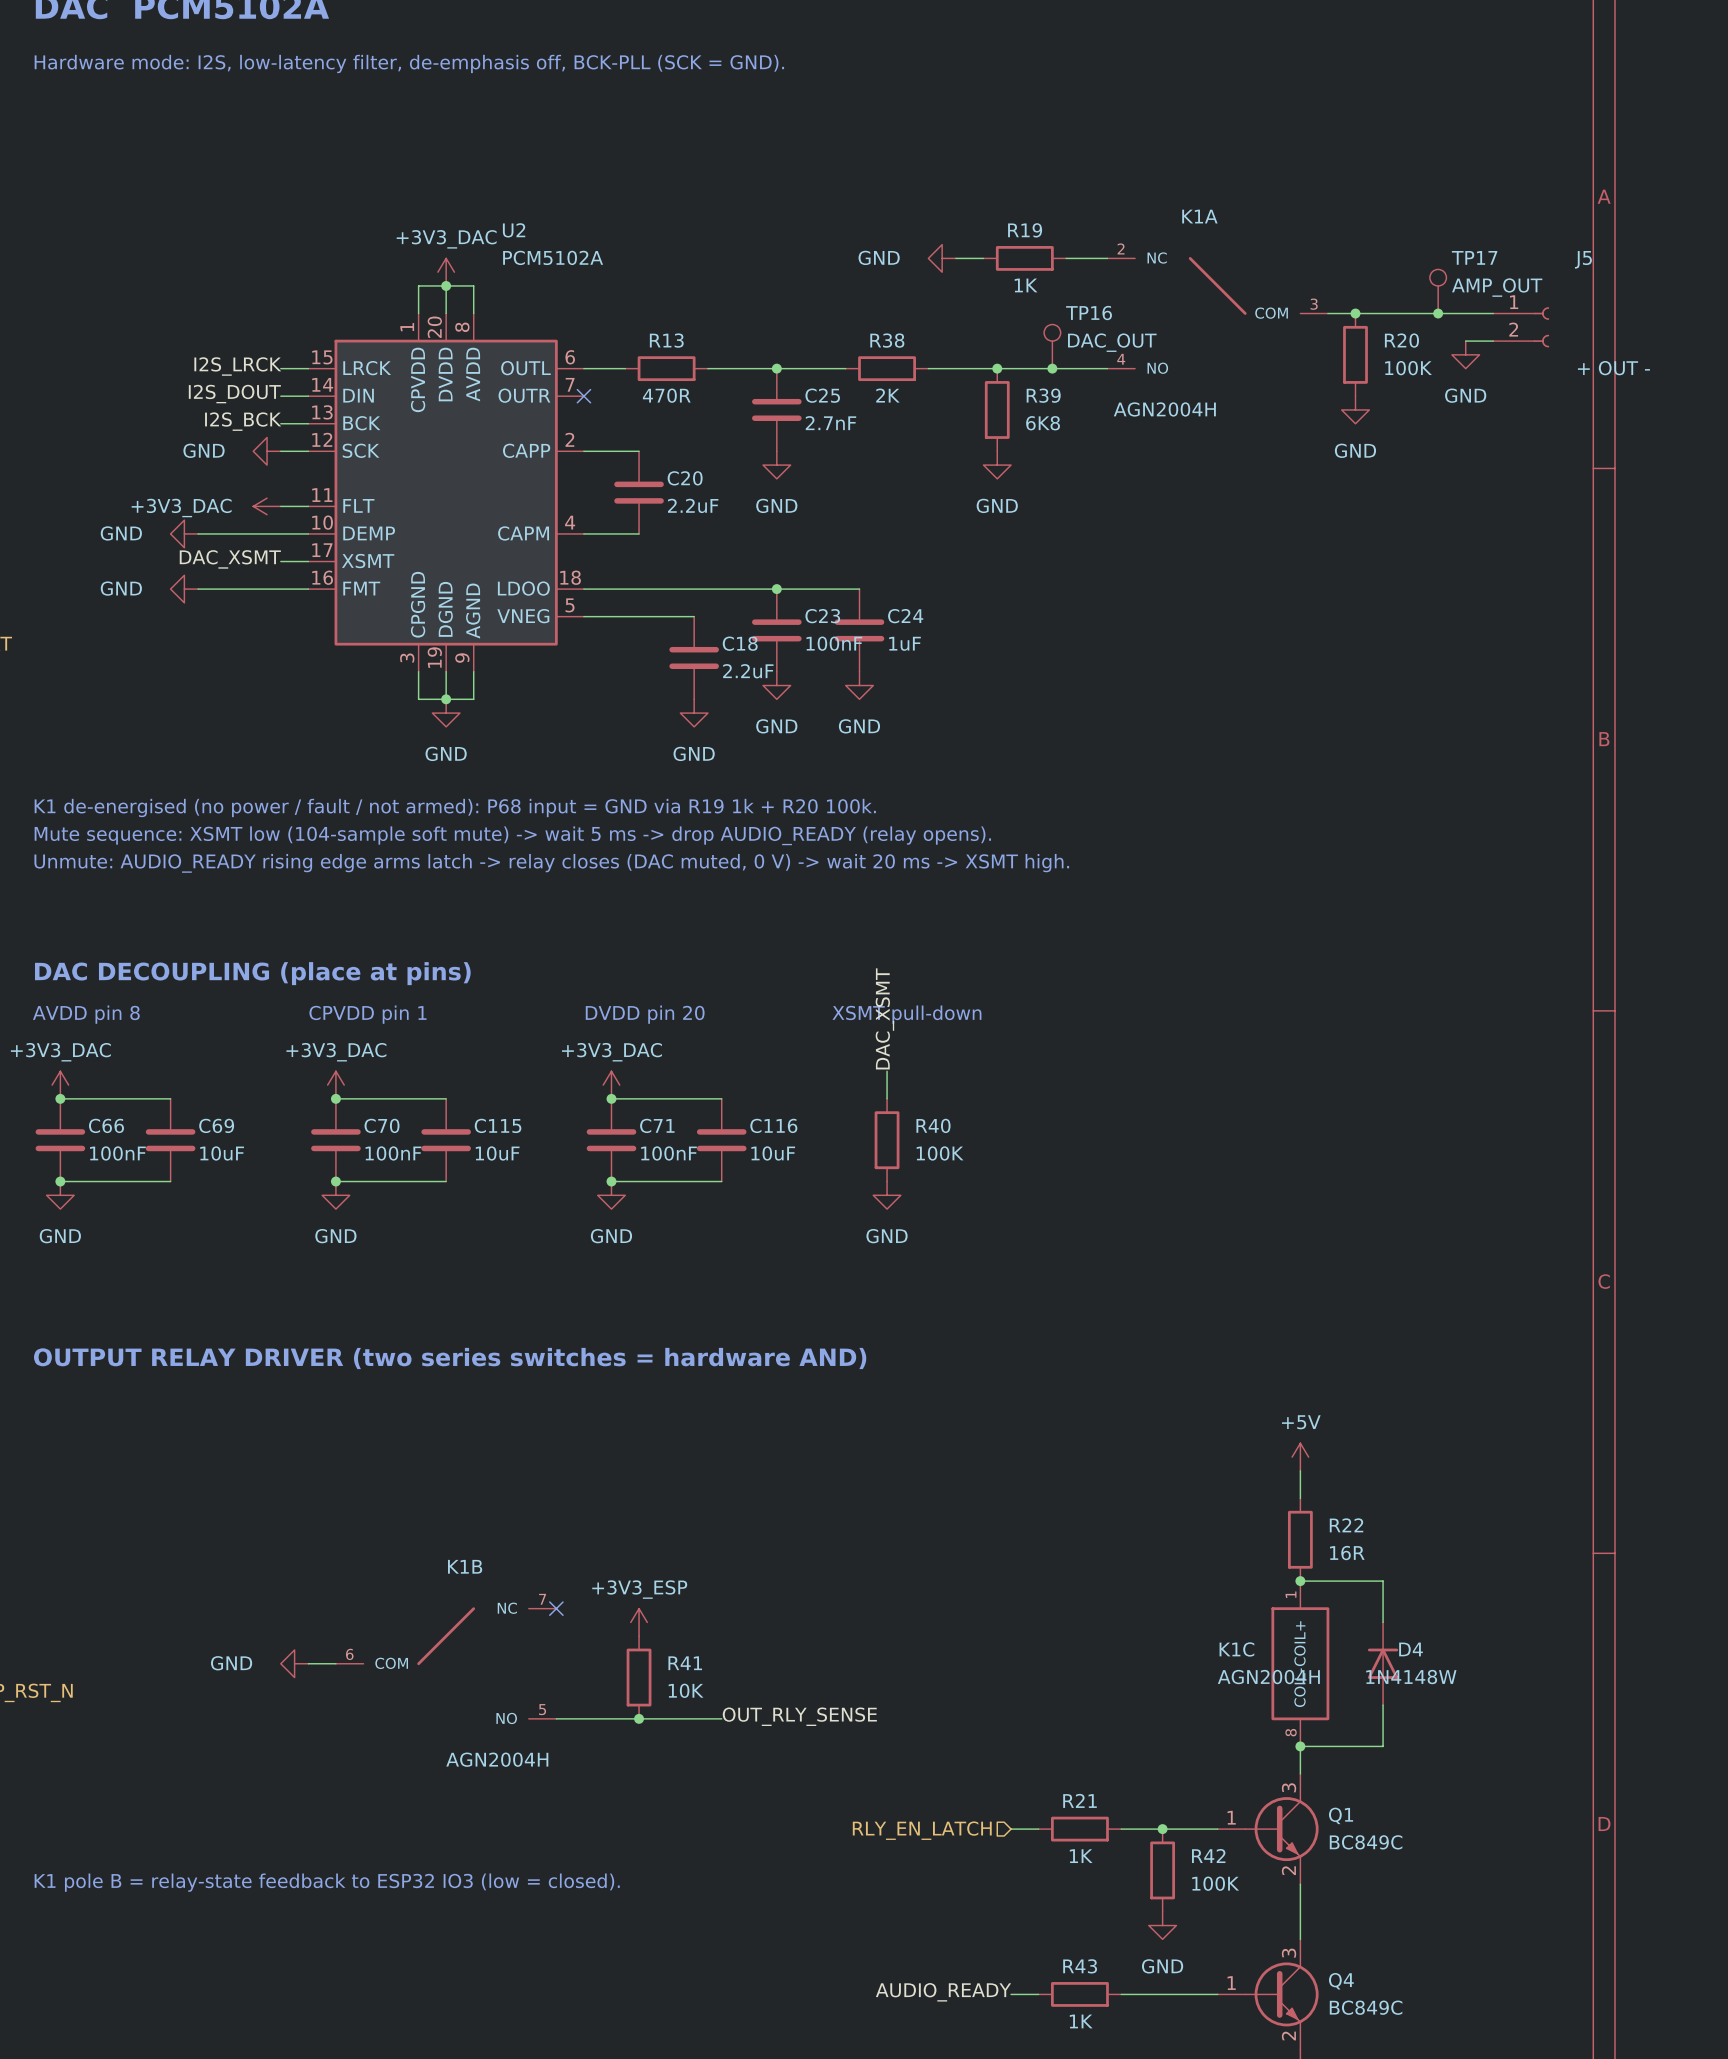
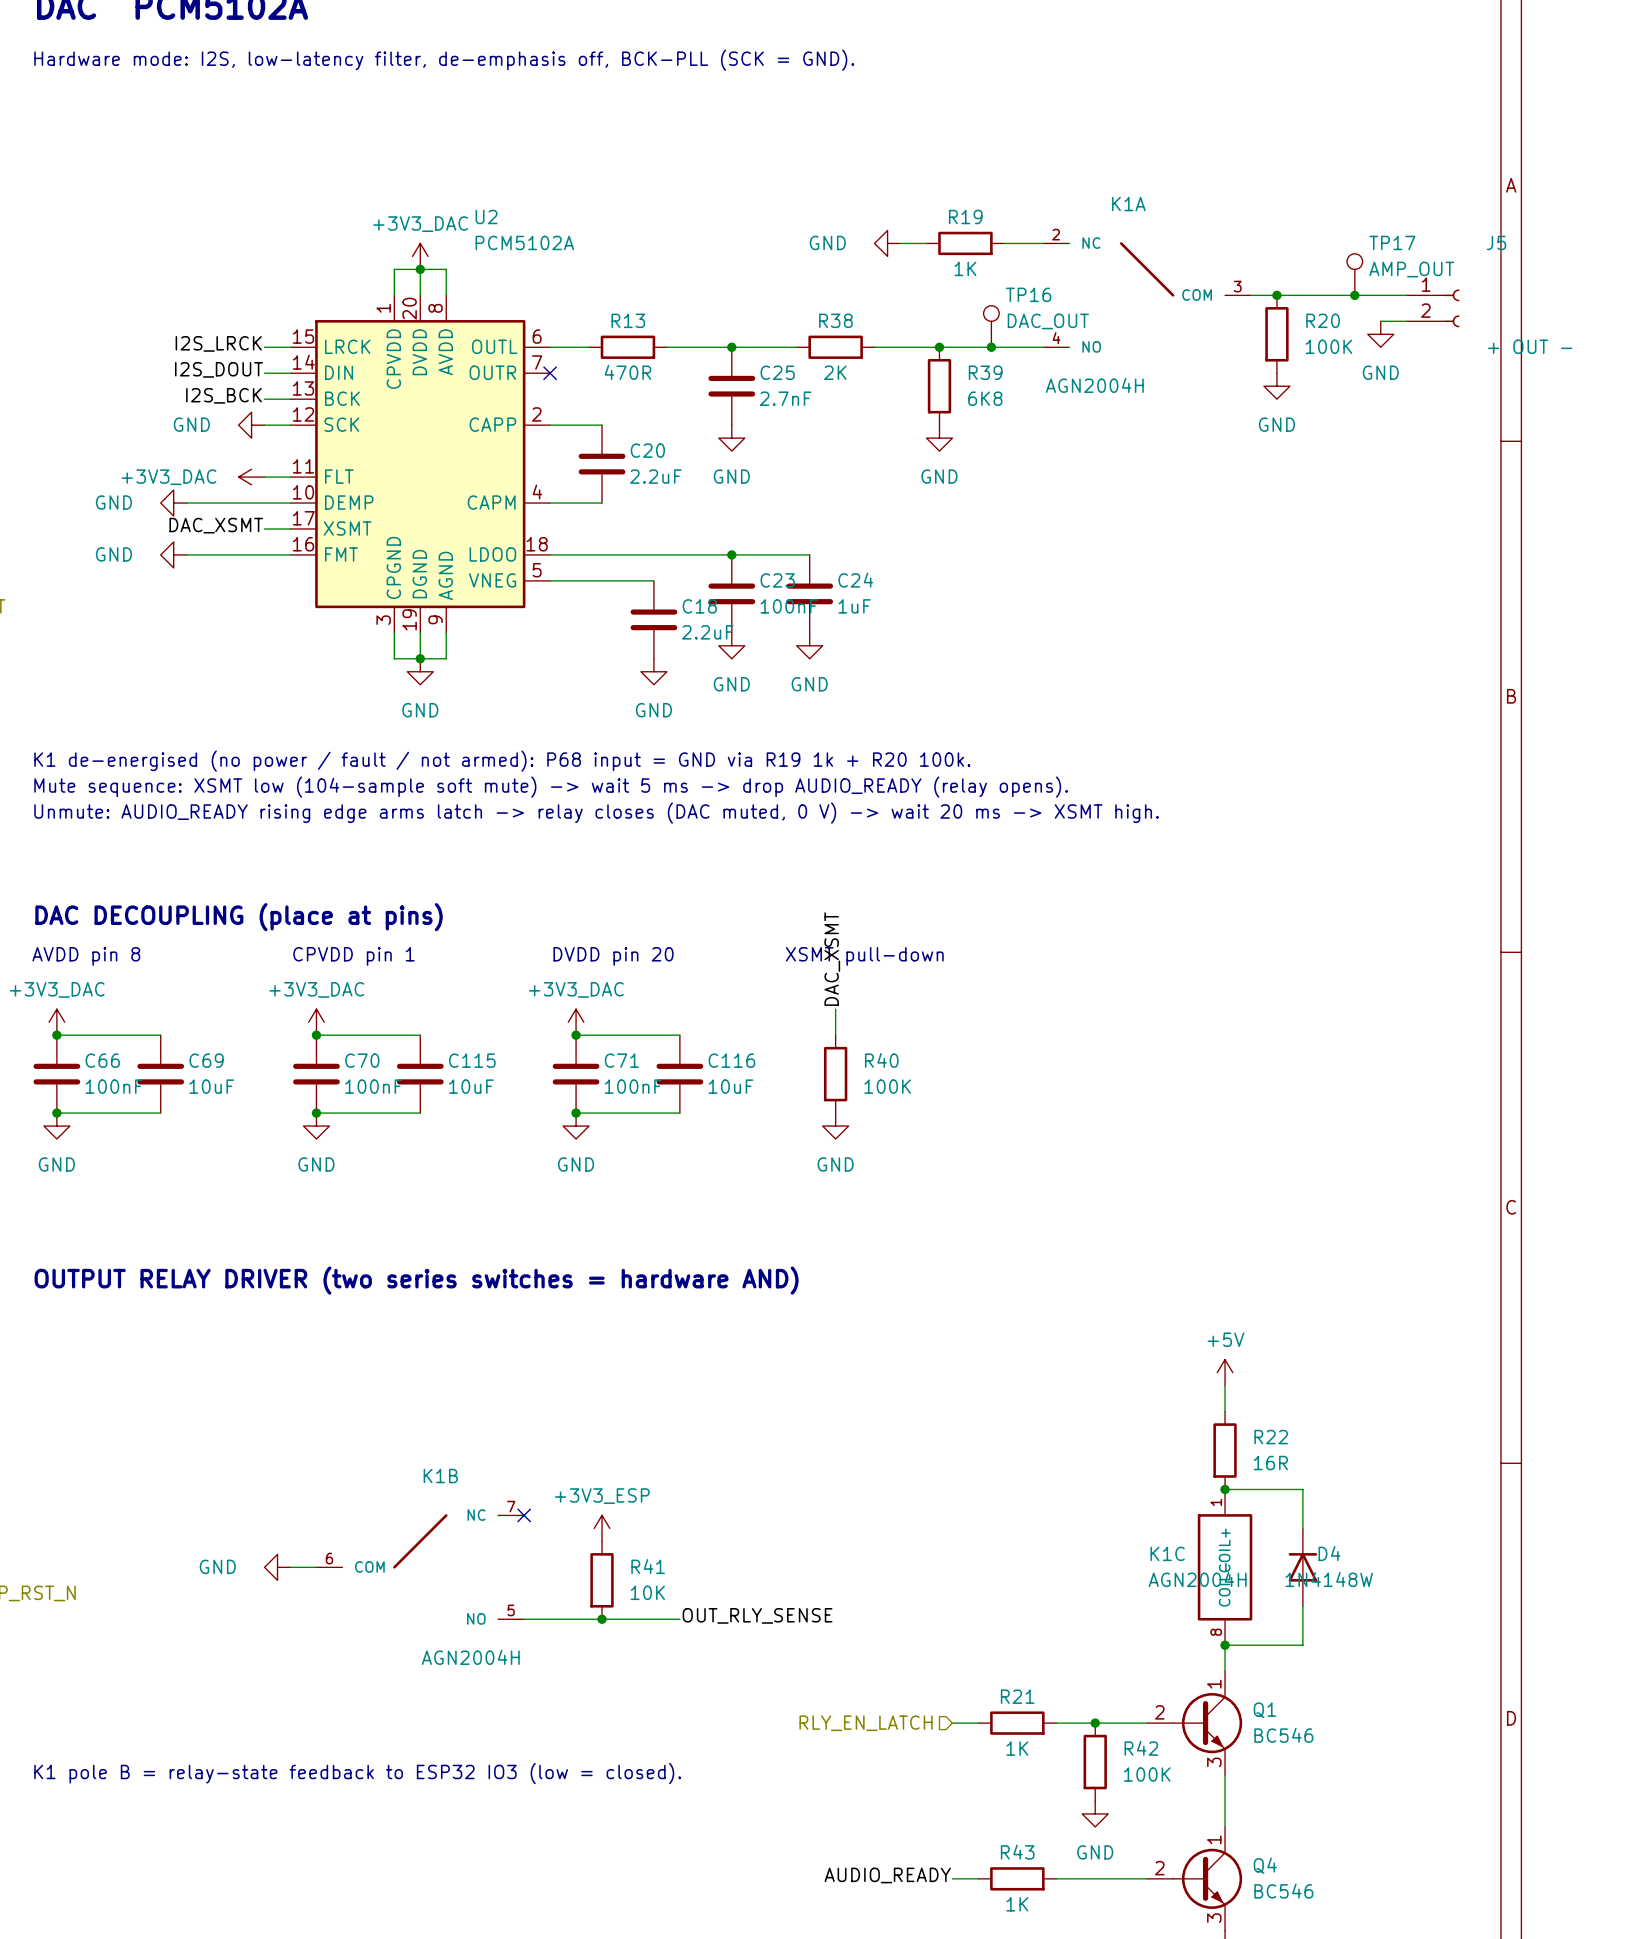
Q1 pin number: 3 (1289, 1787) -> 1 (1214, 1684)
Q1 pin number: 1 (1231, 1817) -> 2 (1159, 1712)
Q1 value: BC849C (1366, 1842) -> BC546 (1283, 1735)
Q1 pin number: 2 (1288, 1870) -> 3 (1214, 1762)
Q4 pin number: 3 (1289, 1953) -> 1 (1214, 1839)
Q4 pin number: 1 (1231, 1983) -> 2 (1159, 1868)
Q4 value: BC849C (1366, 2007) -> BC546 (1283, 1891)
Q4 pin number: 2 (1288, 2036) -> 3 (1214, 1918)

